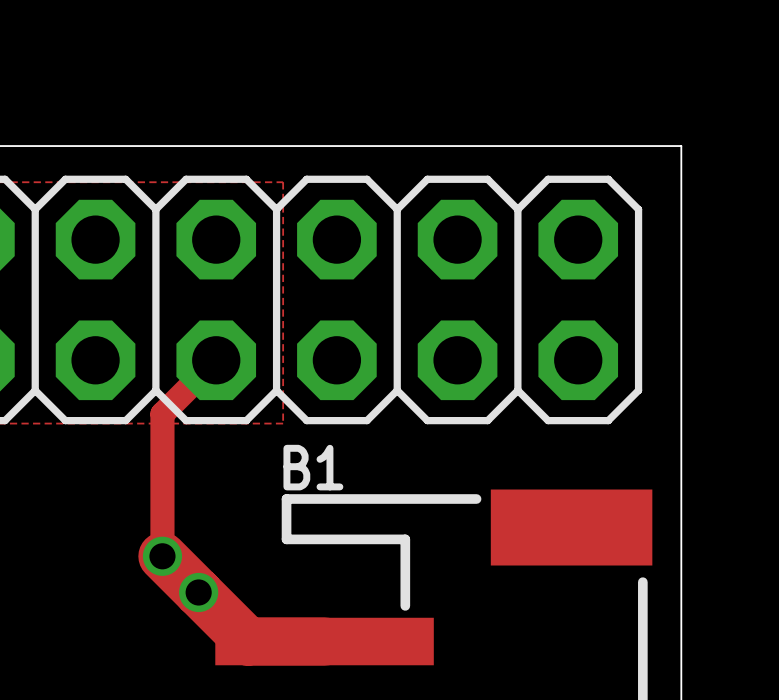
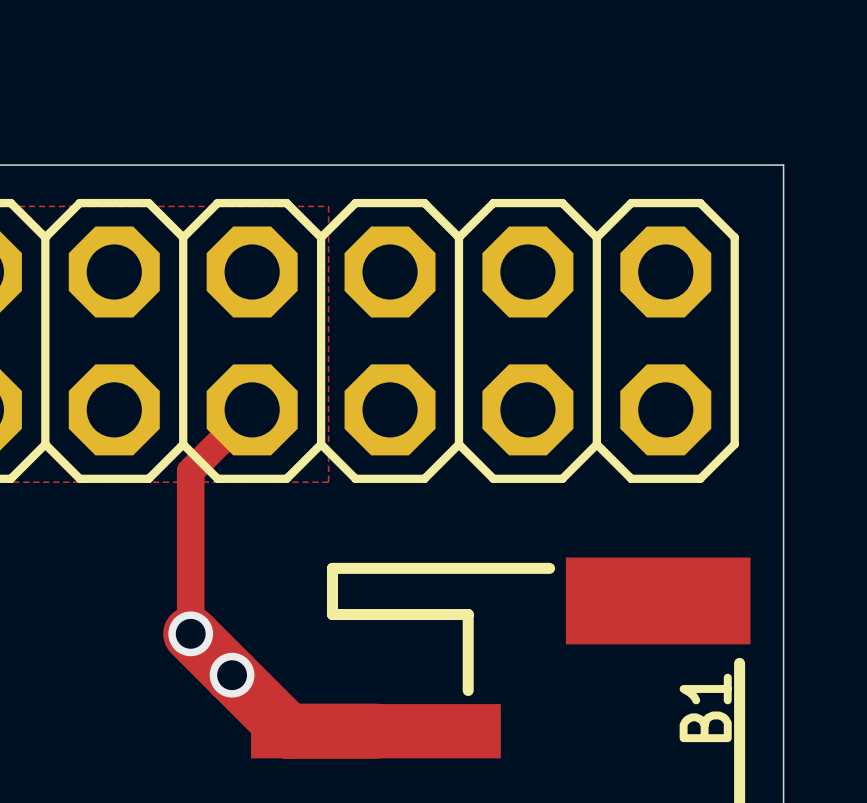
B1 name rotation: 0° (313, 467) -> 90° counterclockwise (705, 707)
B1 name position: B1 (313, 467) -> B1 (705, 707)

